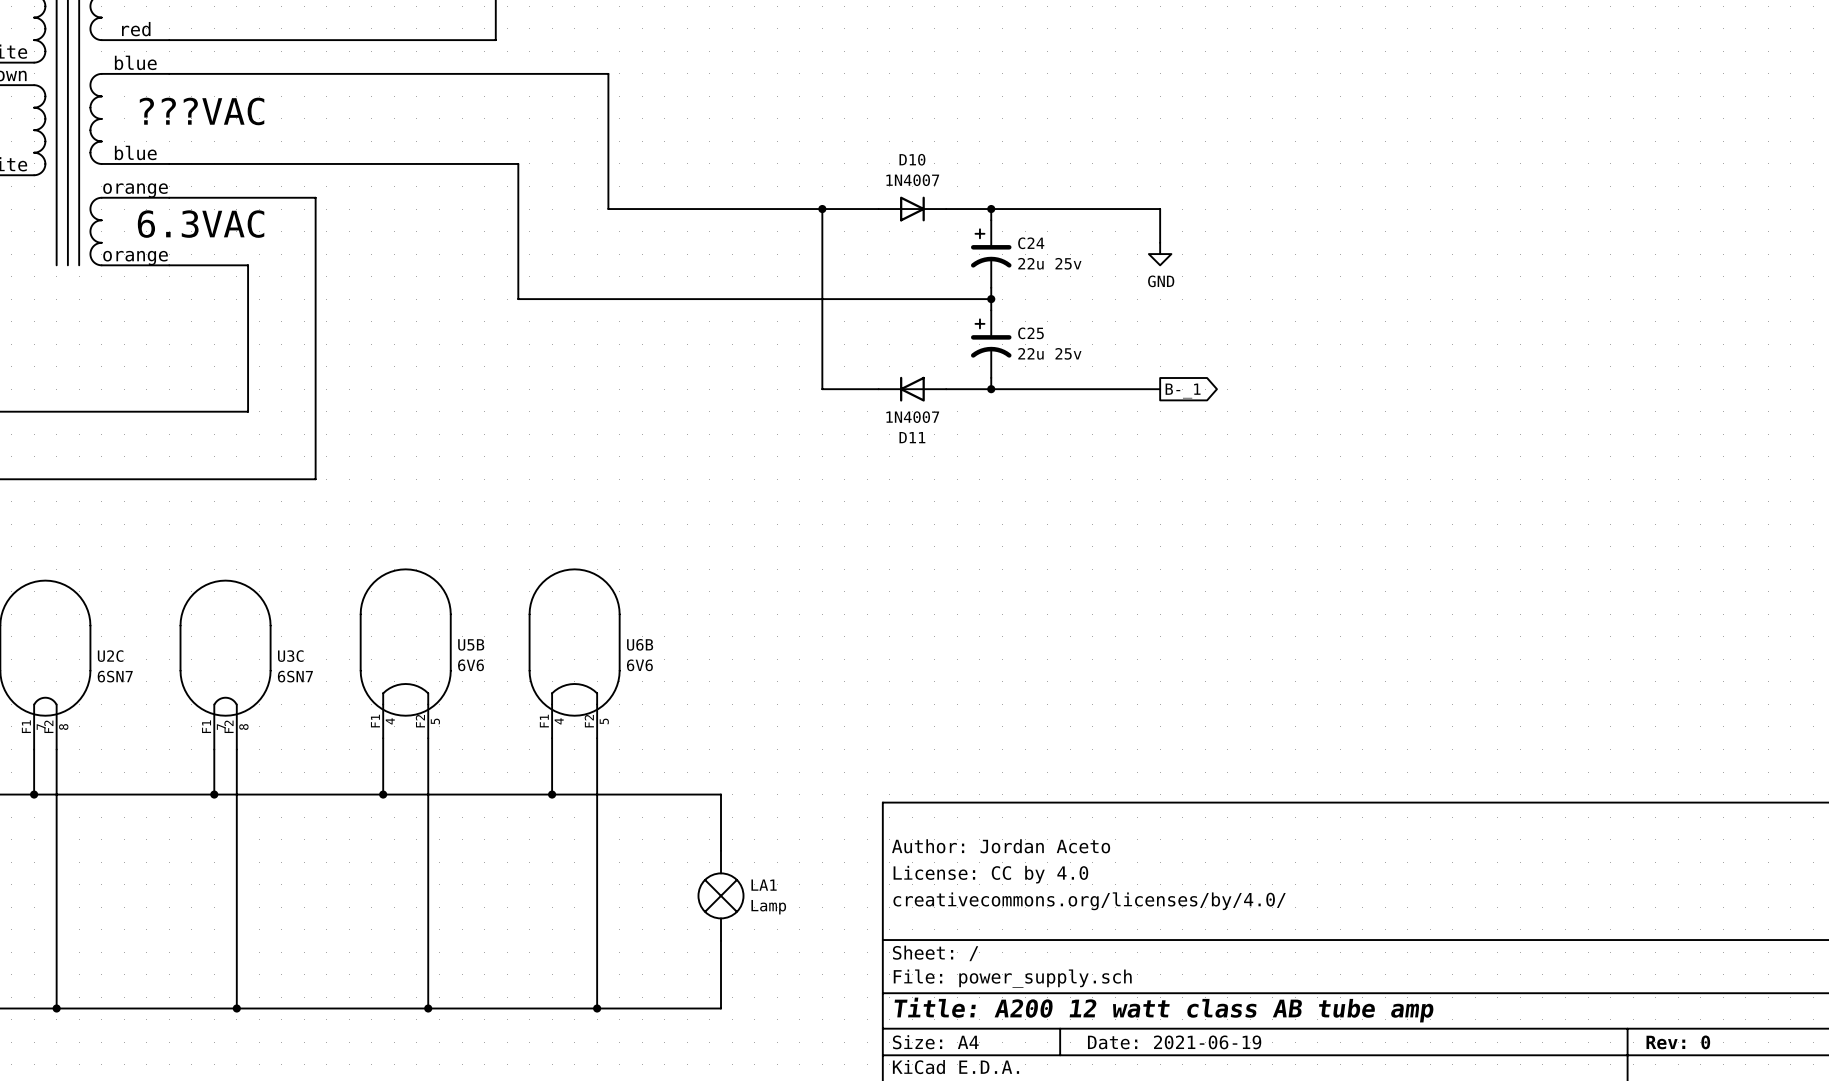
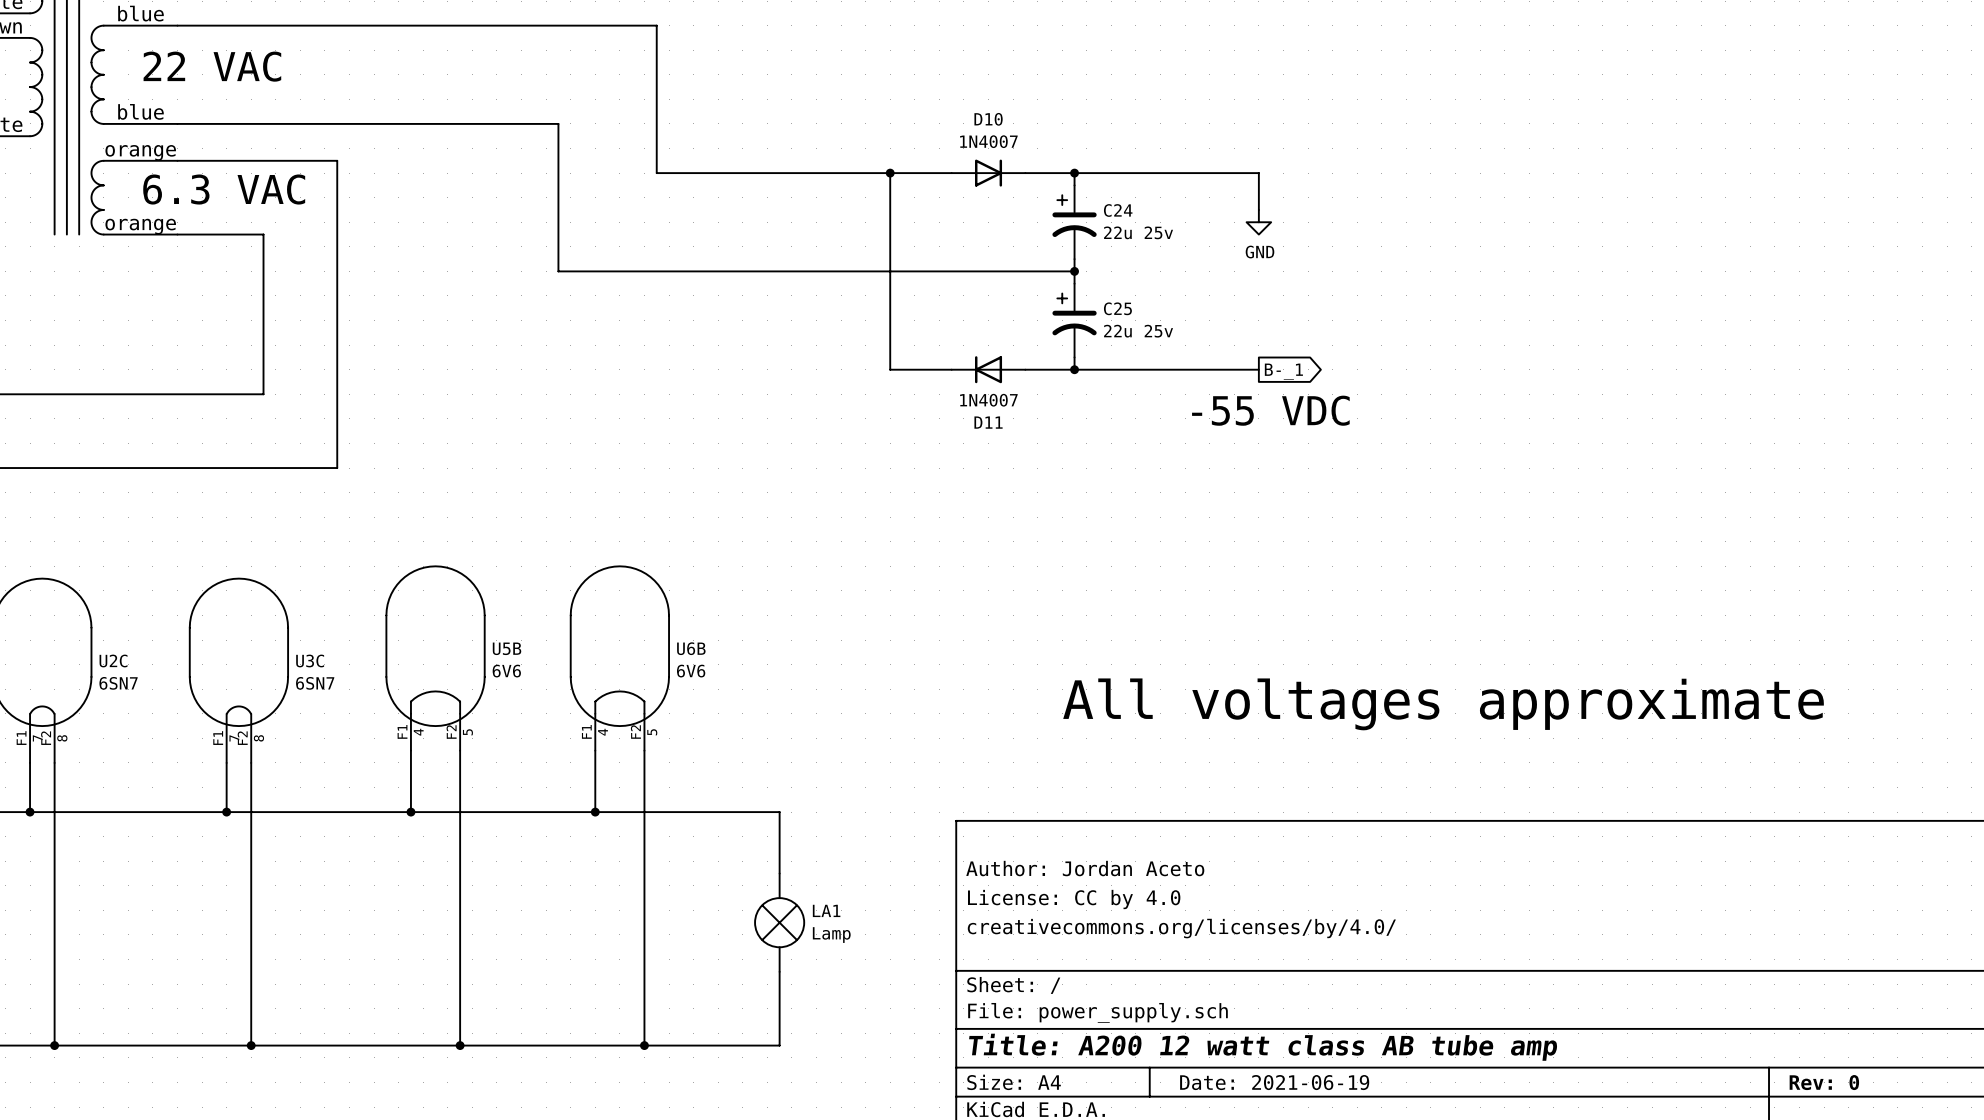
text: ???VAC (202, 111) -> 22 VAC (212, 66)
text: 6.3VAC (201, 224) -> 6.3 VAC (224, 189)
text: none -> -55 VDC (1270, 410)
text: none -> All voltages approximate (1443, 704)

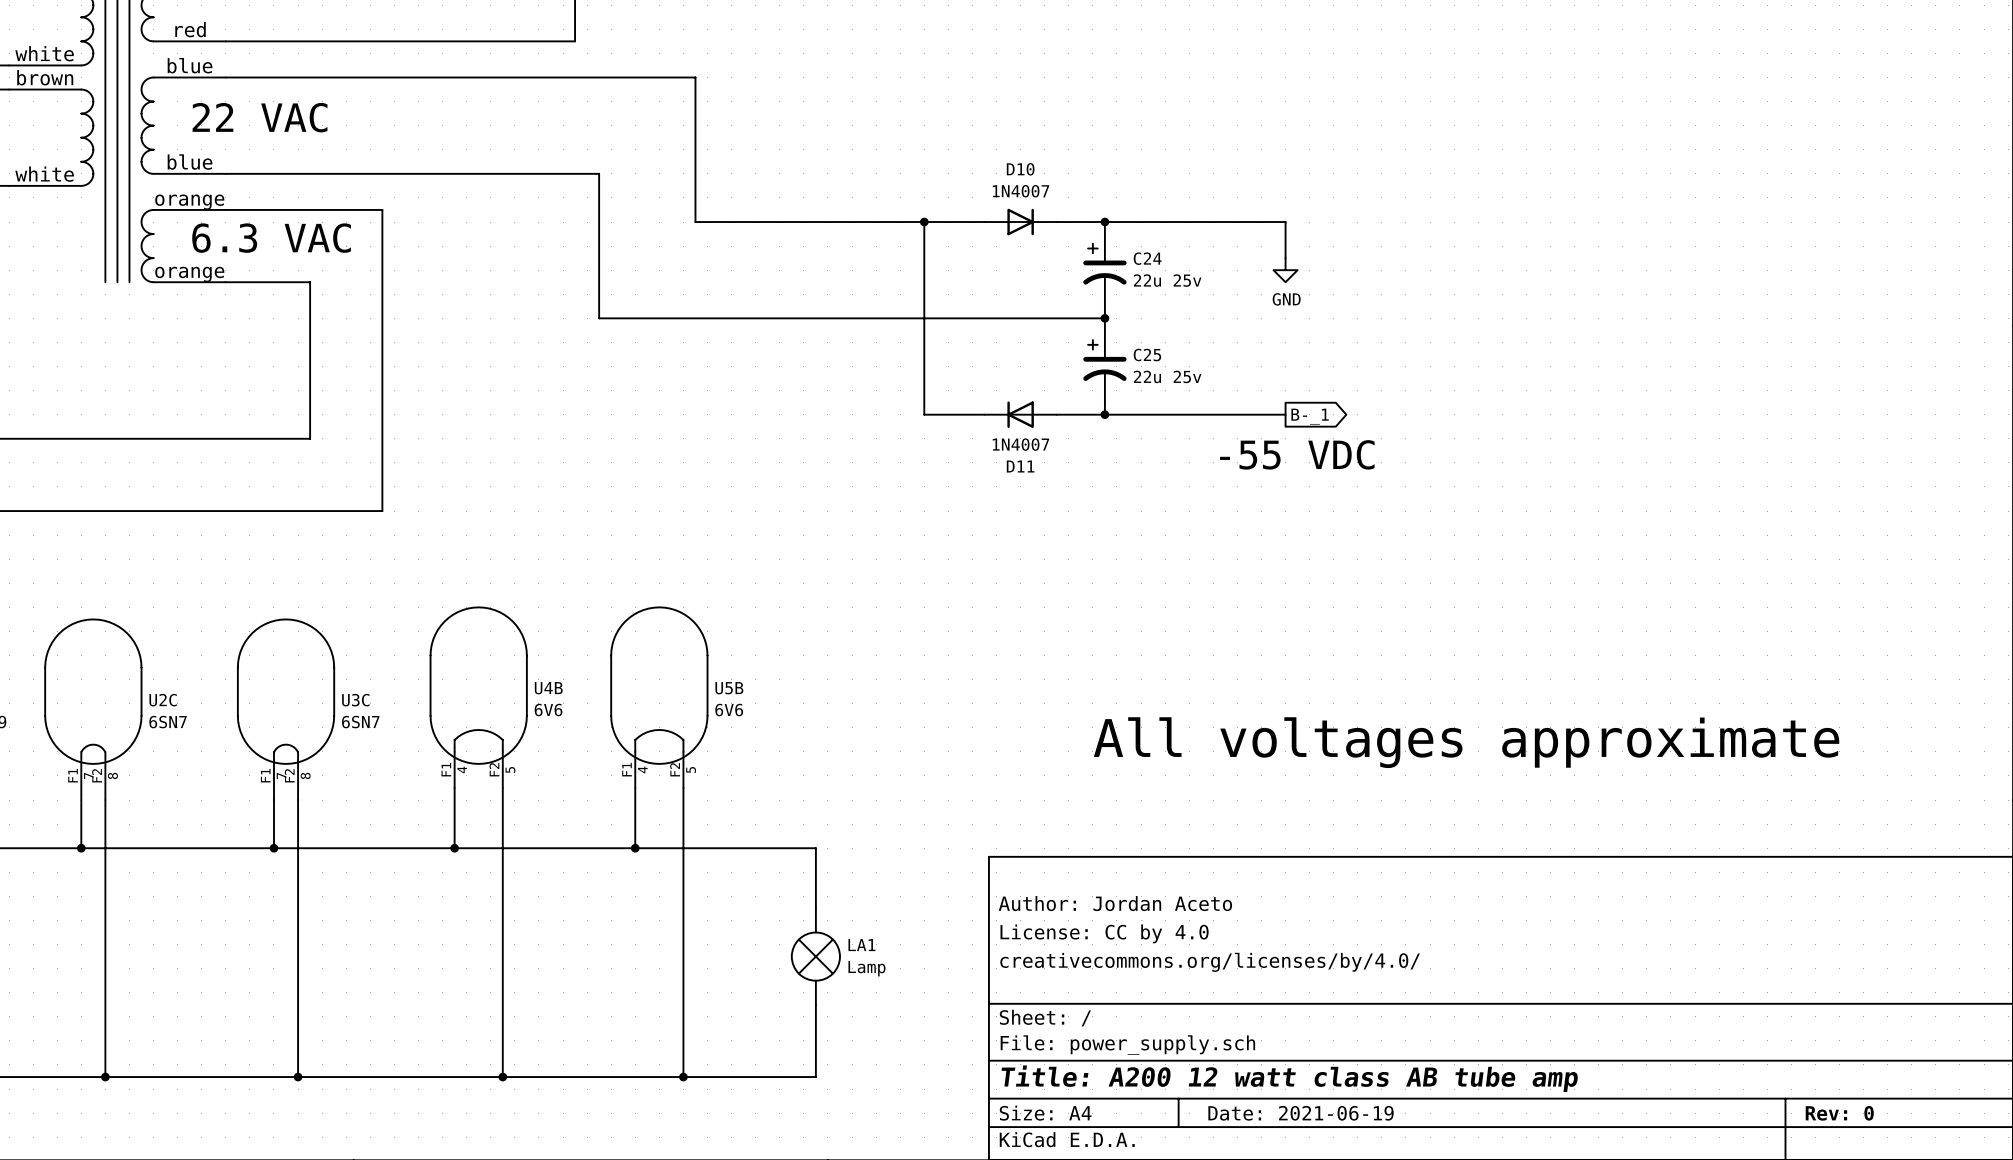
U5B name: U5B (507, 648) -> U4B (548, 688)
U6B name: U6B (691, 648) -> U5B (729, 688)

